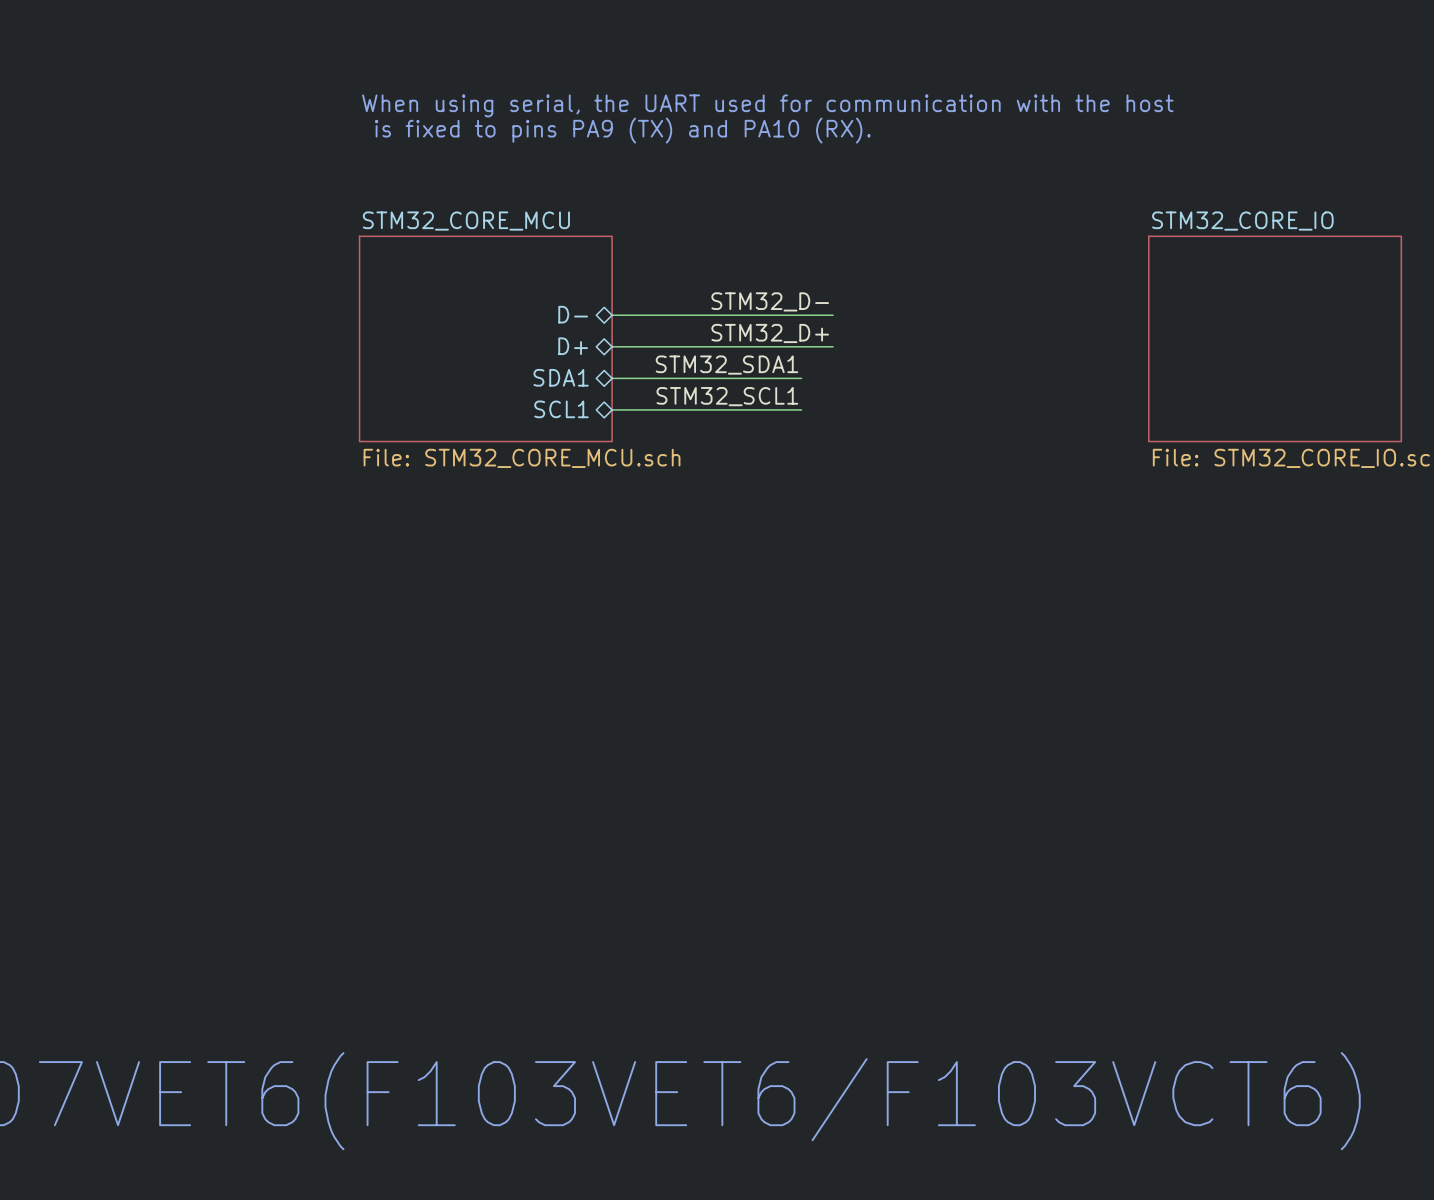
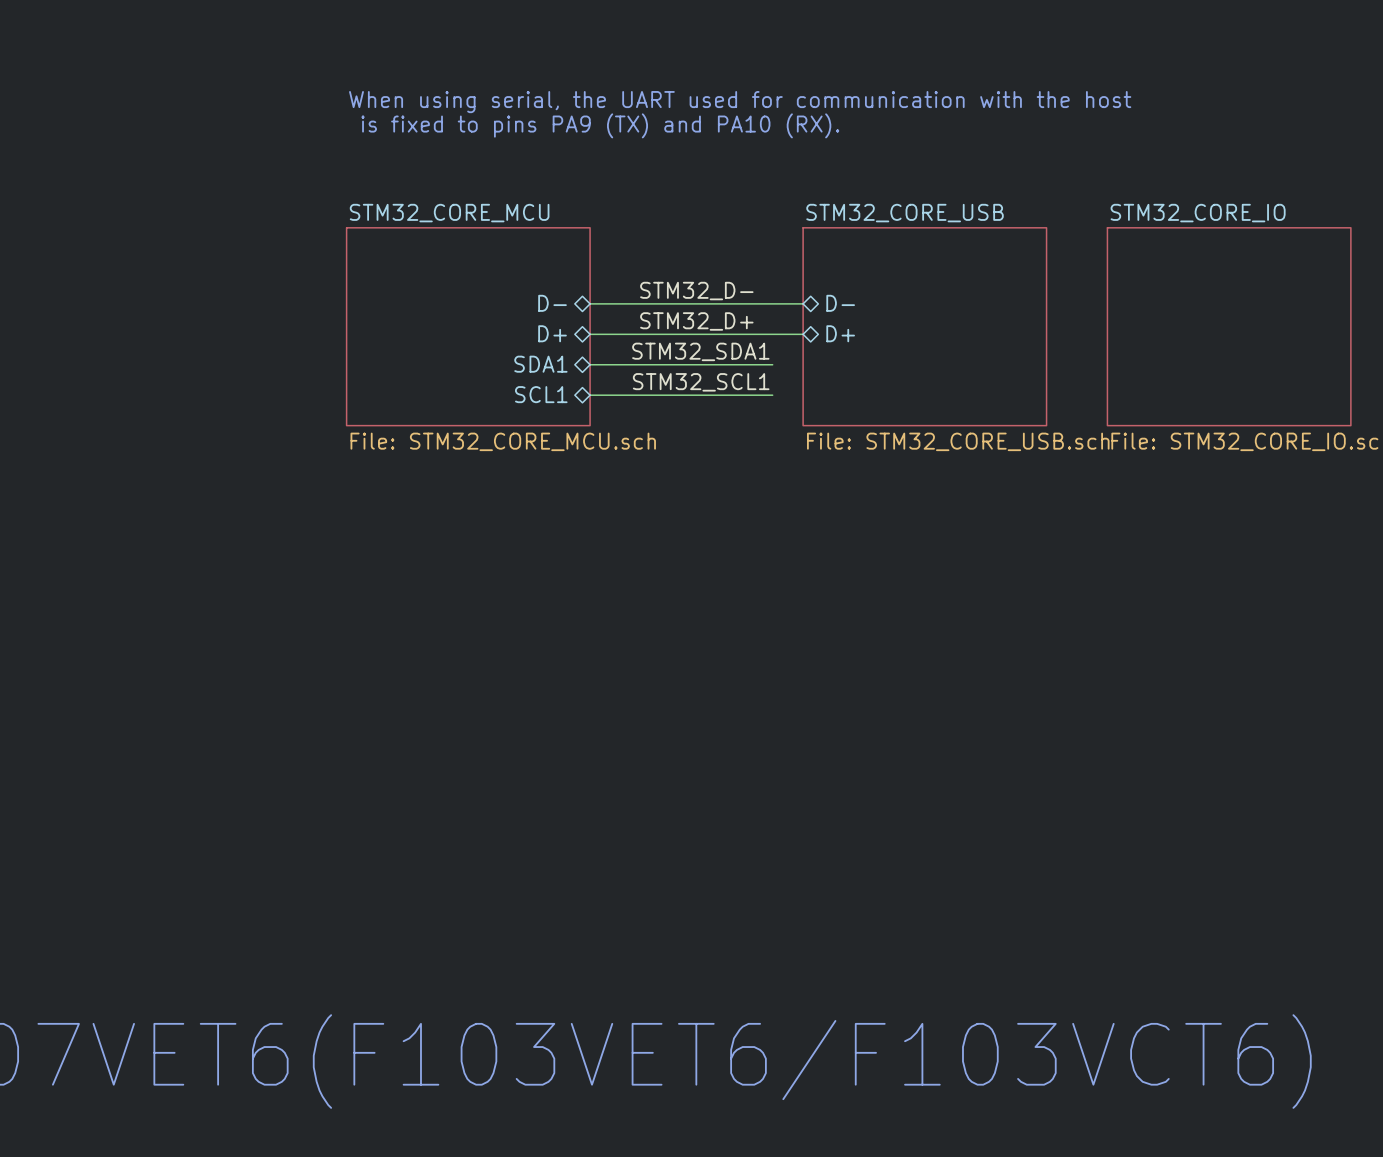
label position: STM32_D- (770, 301) -> STM32_D- (696, 291)
sheet pin: none -> D- (840, 303)
label position: STM32_D+ (770, 333) -> STM32_D+ (696, 321)
sheet STM32_CORE_USB: none -> File: STM32_CORE_USB.sch (924, 326)
sheet pin: none -> D+ (840, 333)

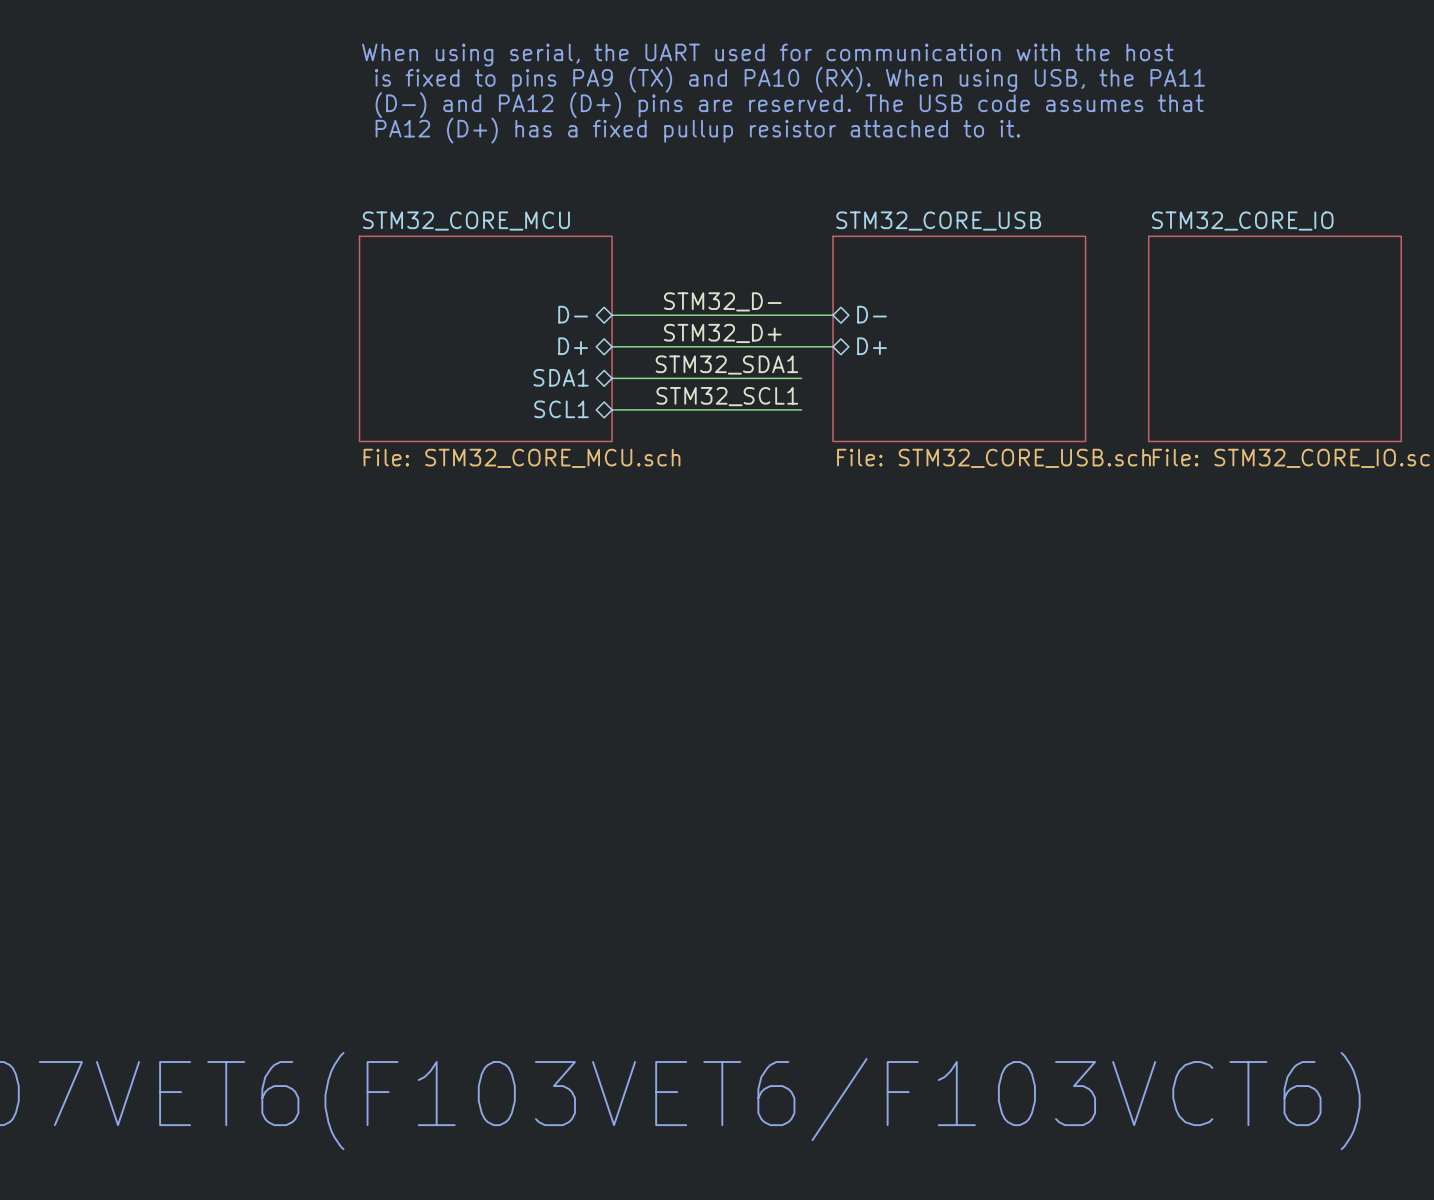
text: none -> When using serial, the UART used for communication with the host (767, 55)
text: none -> is fixed to pins PA9 (TX) and PA10 (RX). When using USB, the PA11 (789, 79)
text: When using serial, the UART used for communication with the host (740, 102) -> (D-) and PA12 (D+) pins are reserved. The USB code assumes that (789, 105)
text: is fixed to pins PA9 (TX) and PA10 (RX). (600, 125) -> PA12 (D+) has a fixed pullup resistor attached to it. (697, 130)

